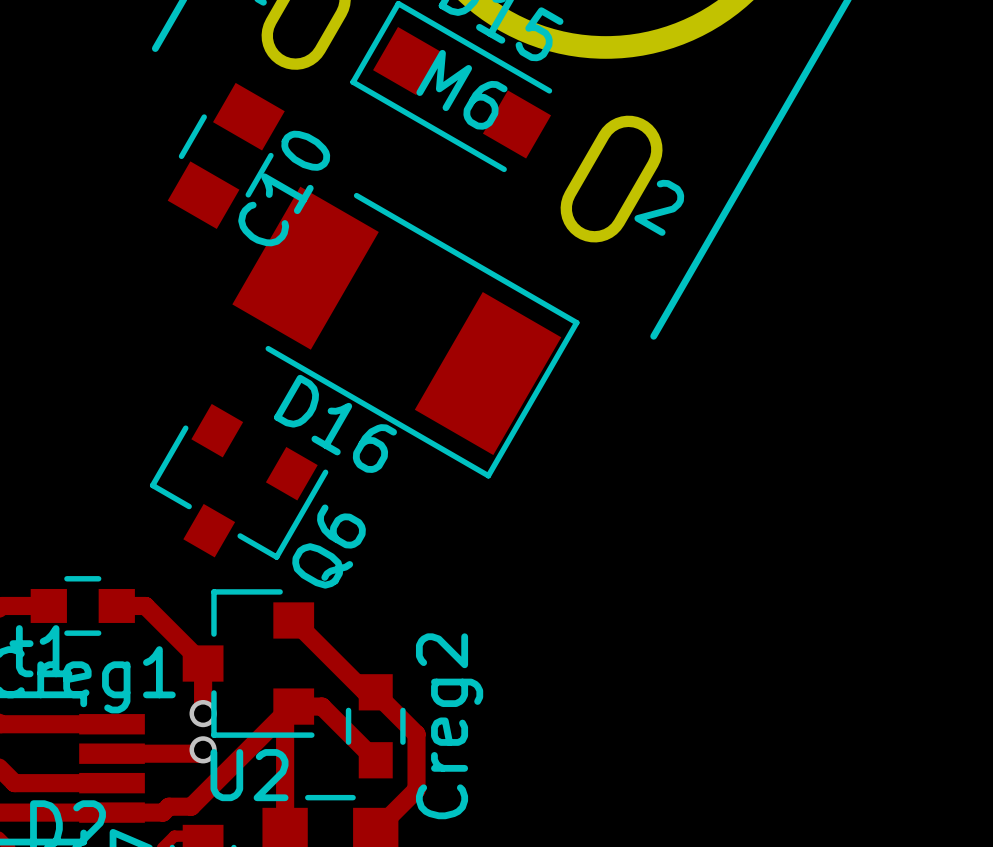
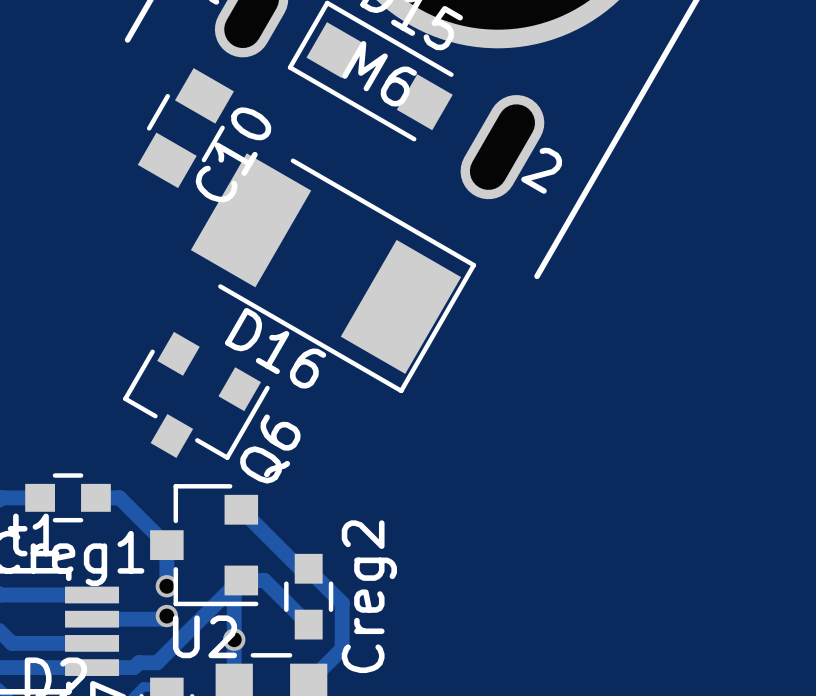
via: none -> (234, 639)

